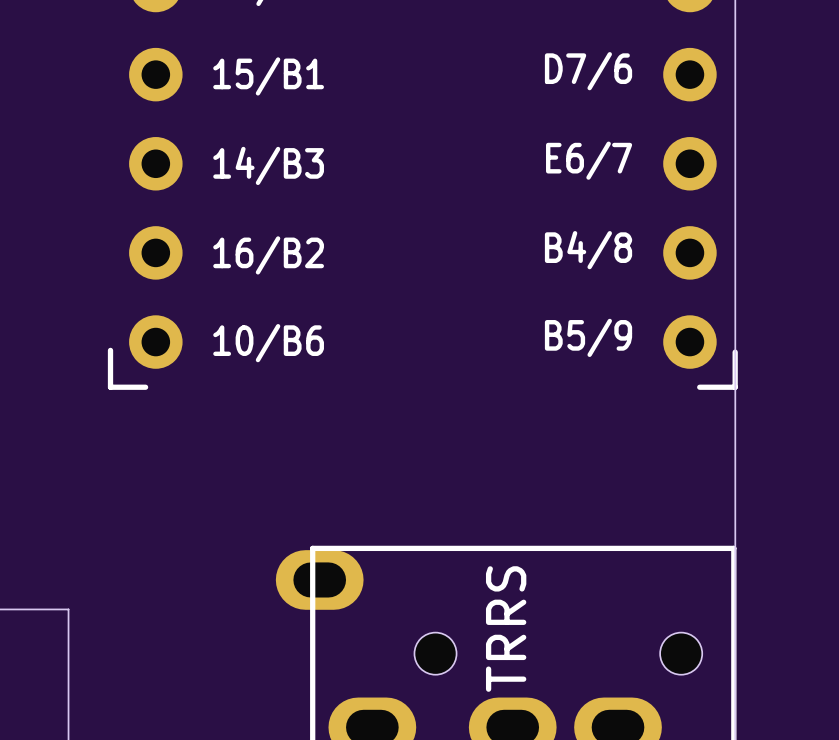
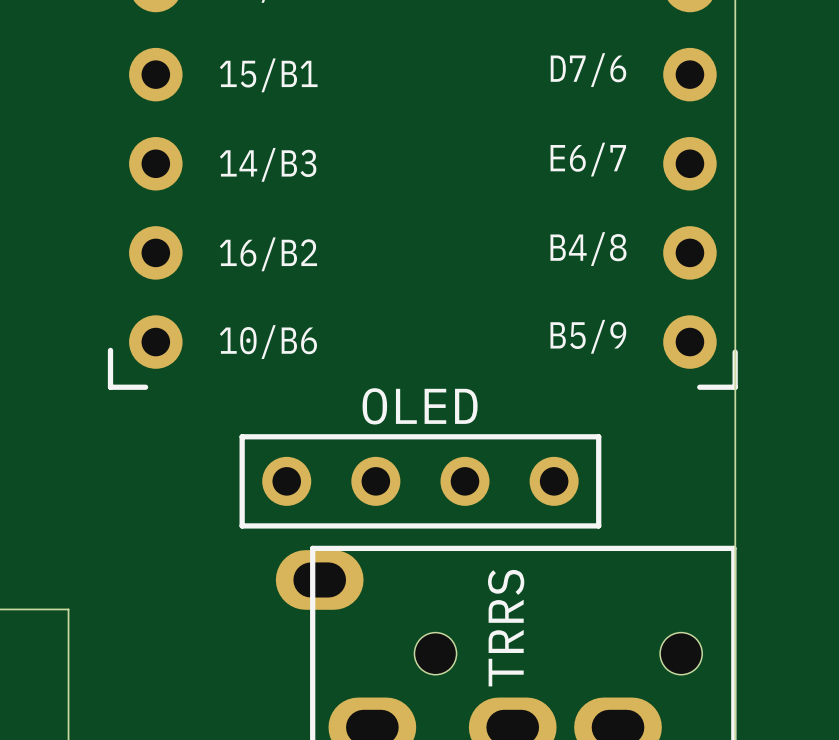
part: none -> (420, 481)

